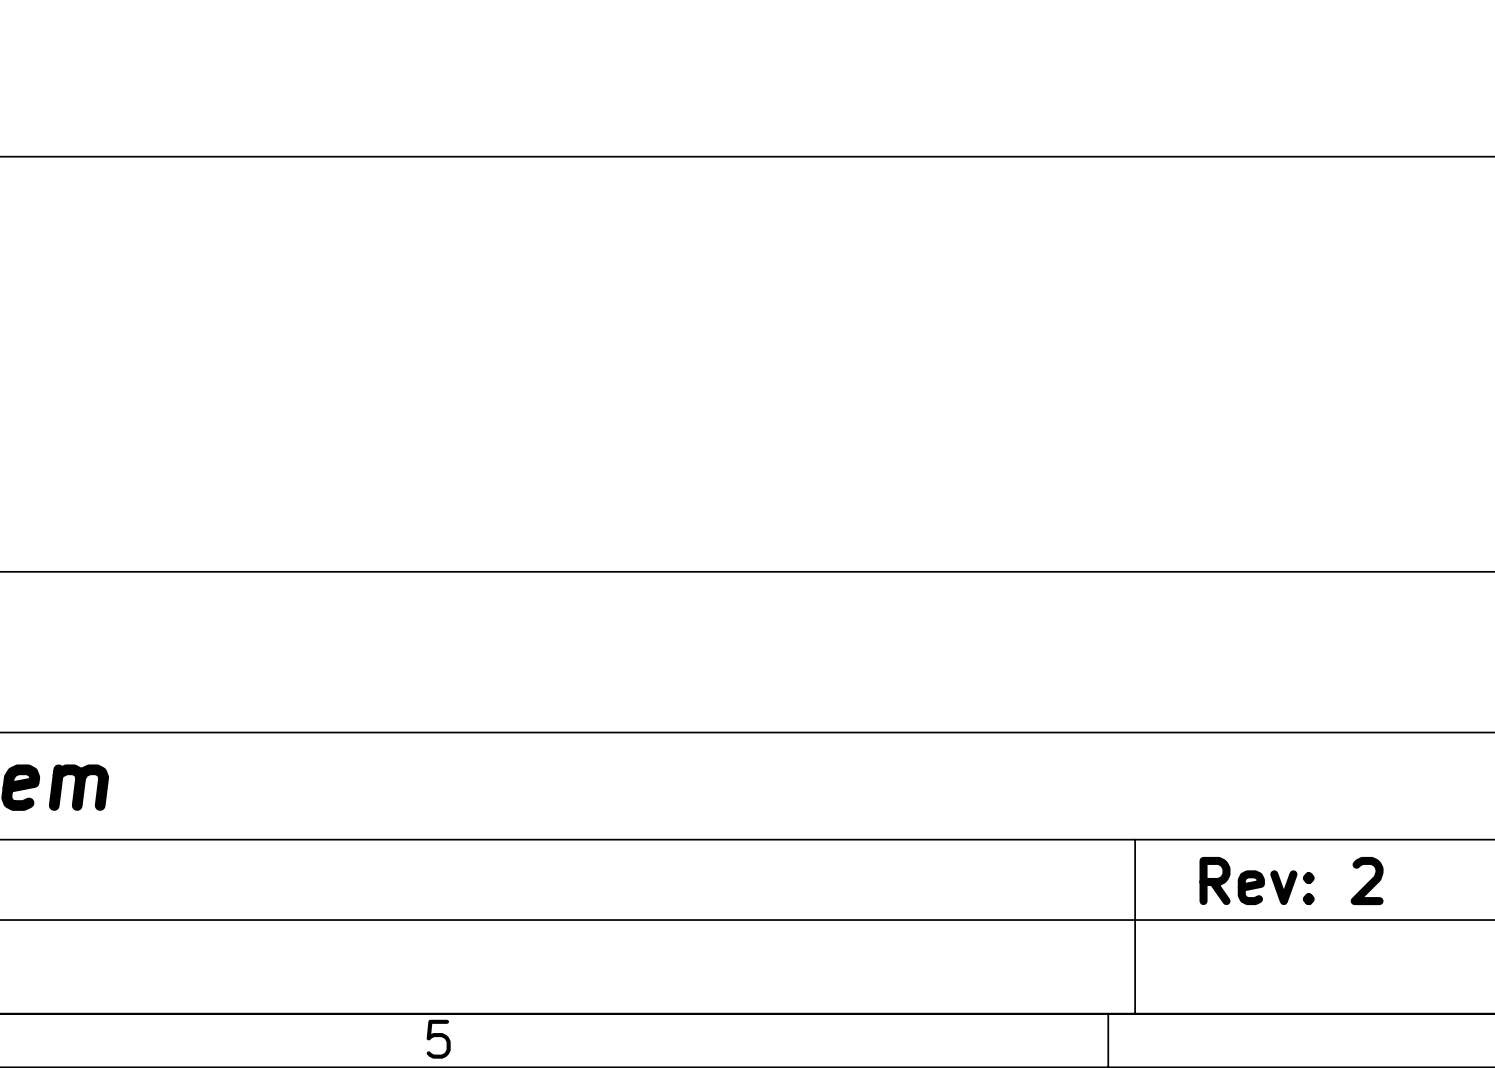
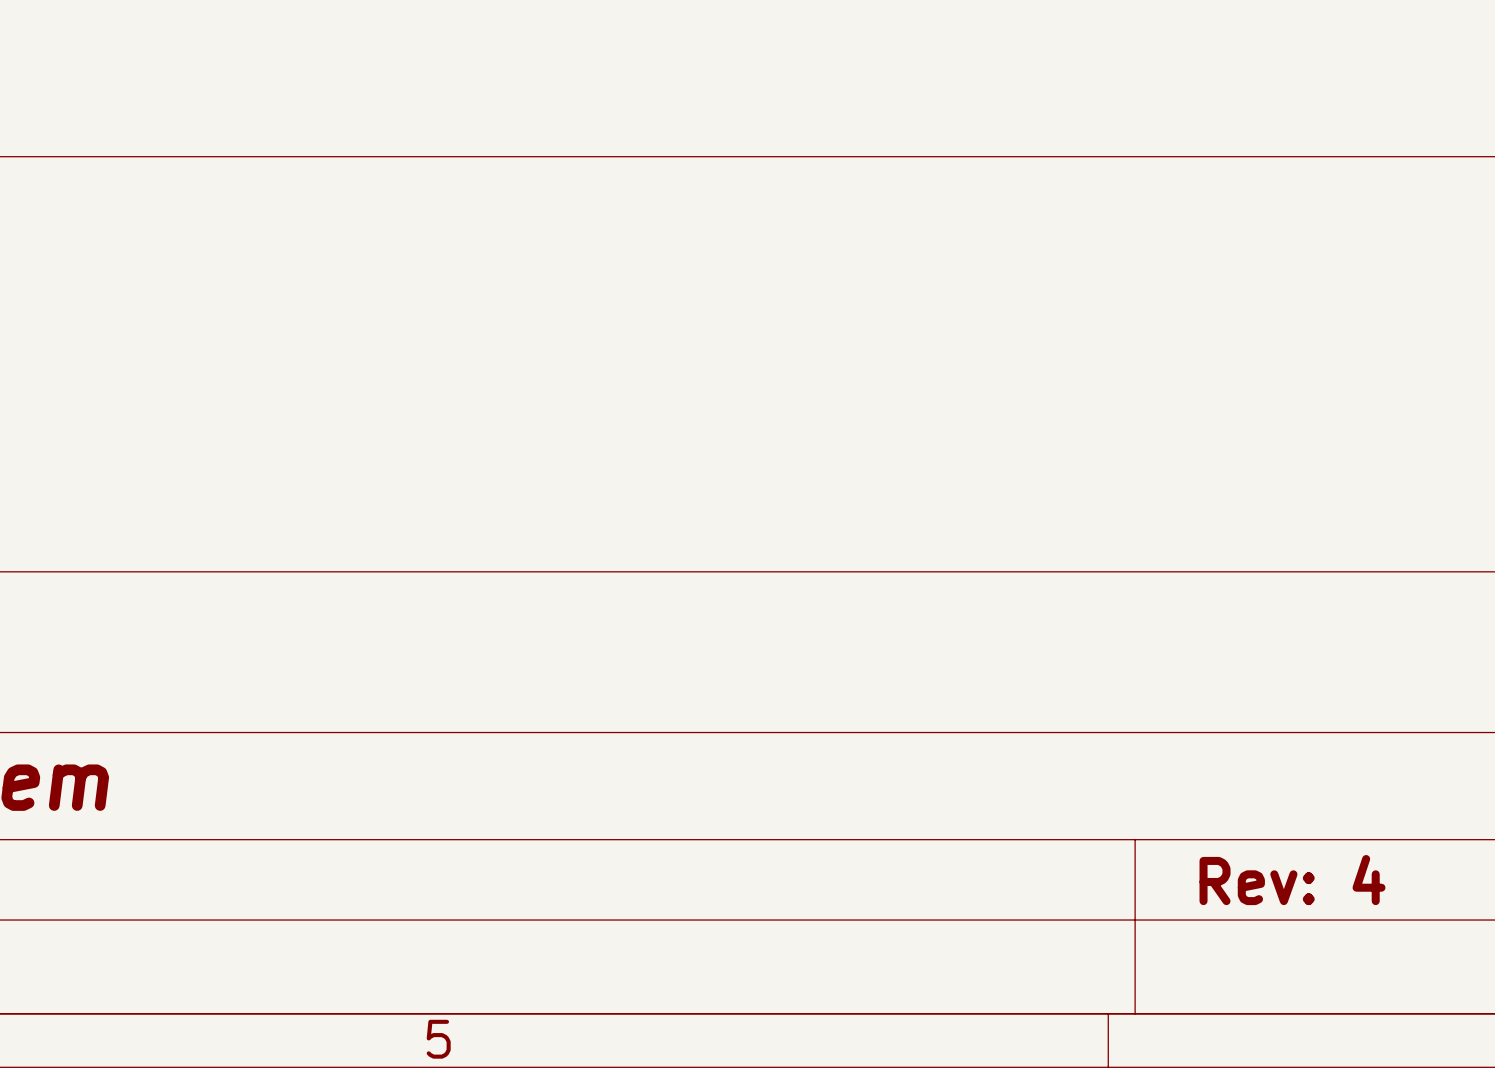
title block: Rev: 2 (1291, 881) -> Rev: 4 (1292, 880)

